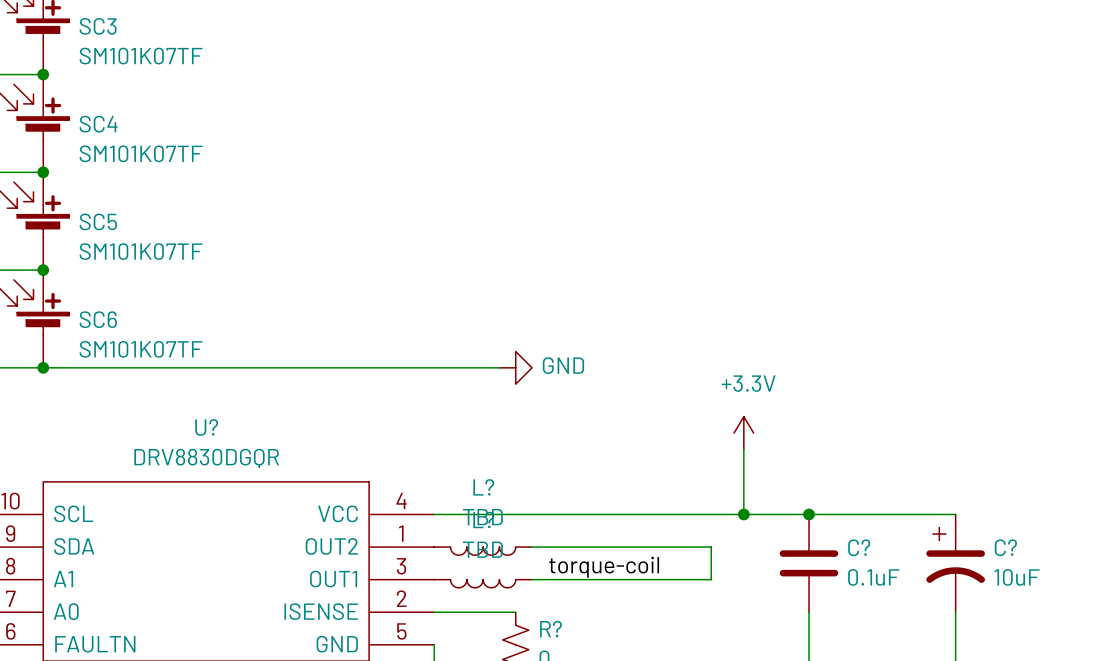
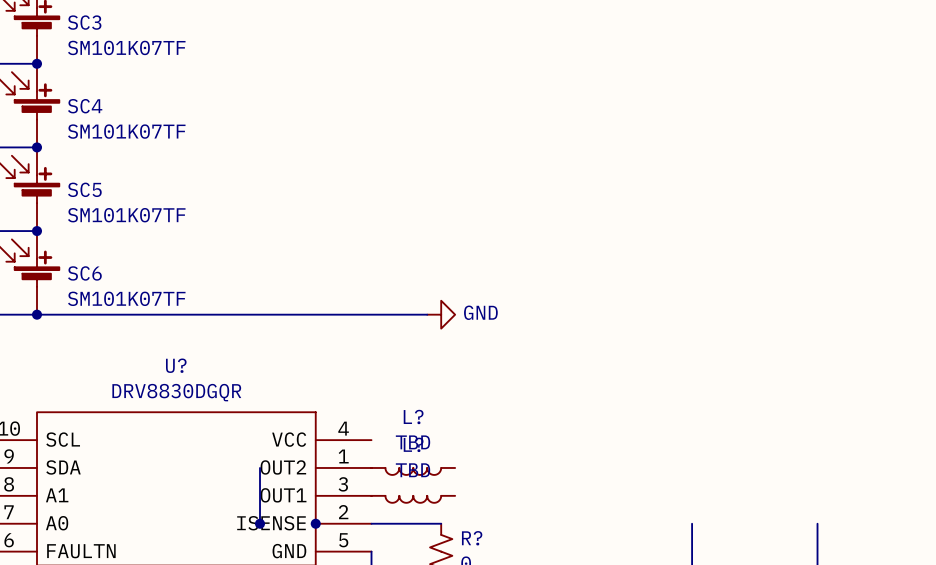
power symbol: +3.3V (743, 433) -> none
wire: (743, 449) (743, 514) -> none
wire: (434, 514) (955, 514) -> none
junction: (743, 514) -> none
junction: (809, 514) -> none
wire: none -> (260, 467) (260, 523)
wire: (532, 547) (711, 547) (711, 579) (532, 579) -> none
C?: 0.1uF (809, 563) -> none
C?: 10uF (955, 563) -> none
label: torque-coil (604, 567) -> none
junction: none -> (260, 523)
junction: none -> (315, 523)

